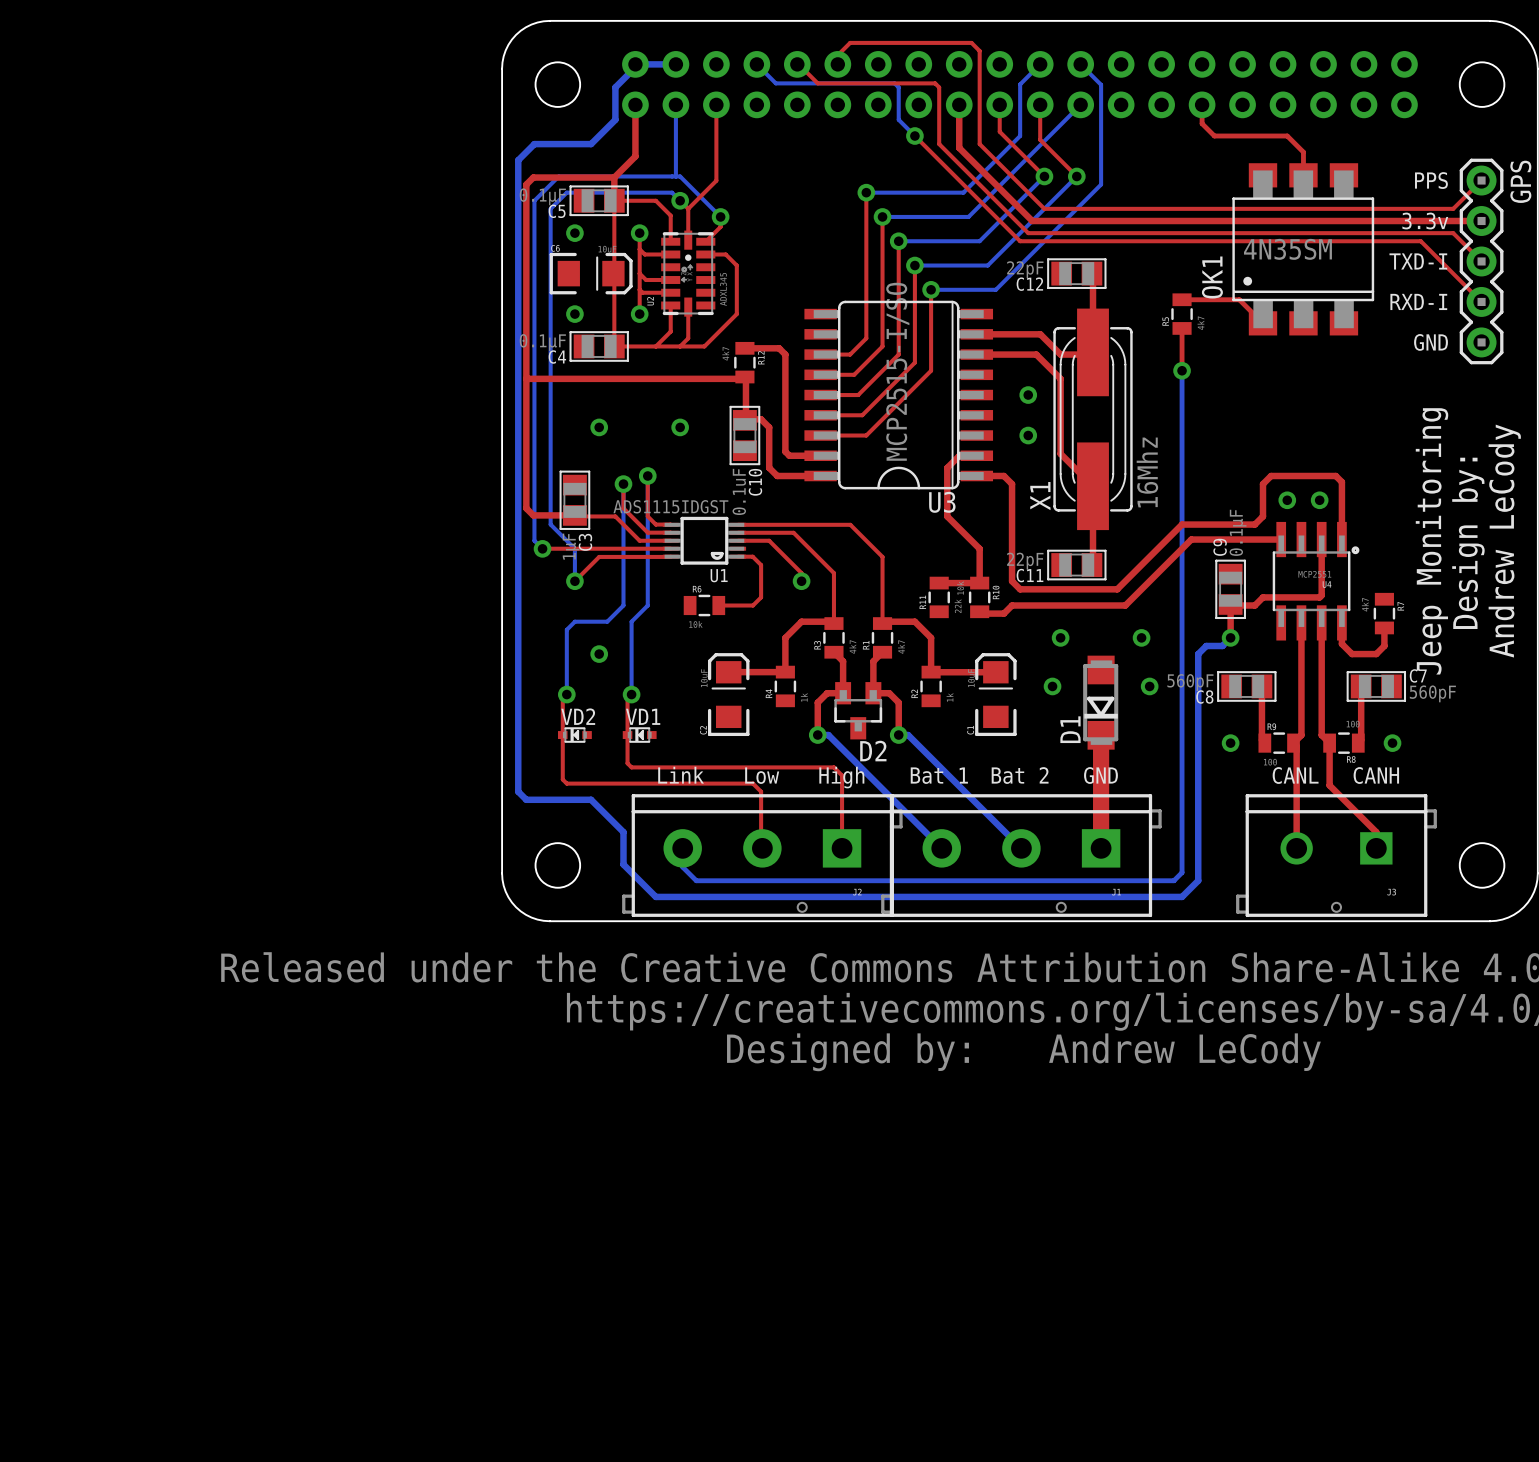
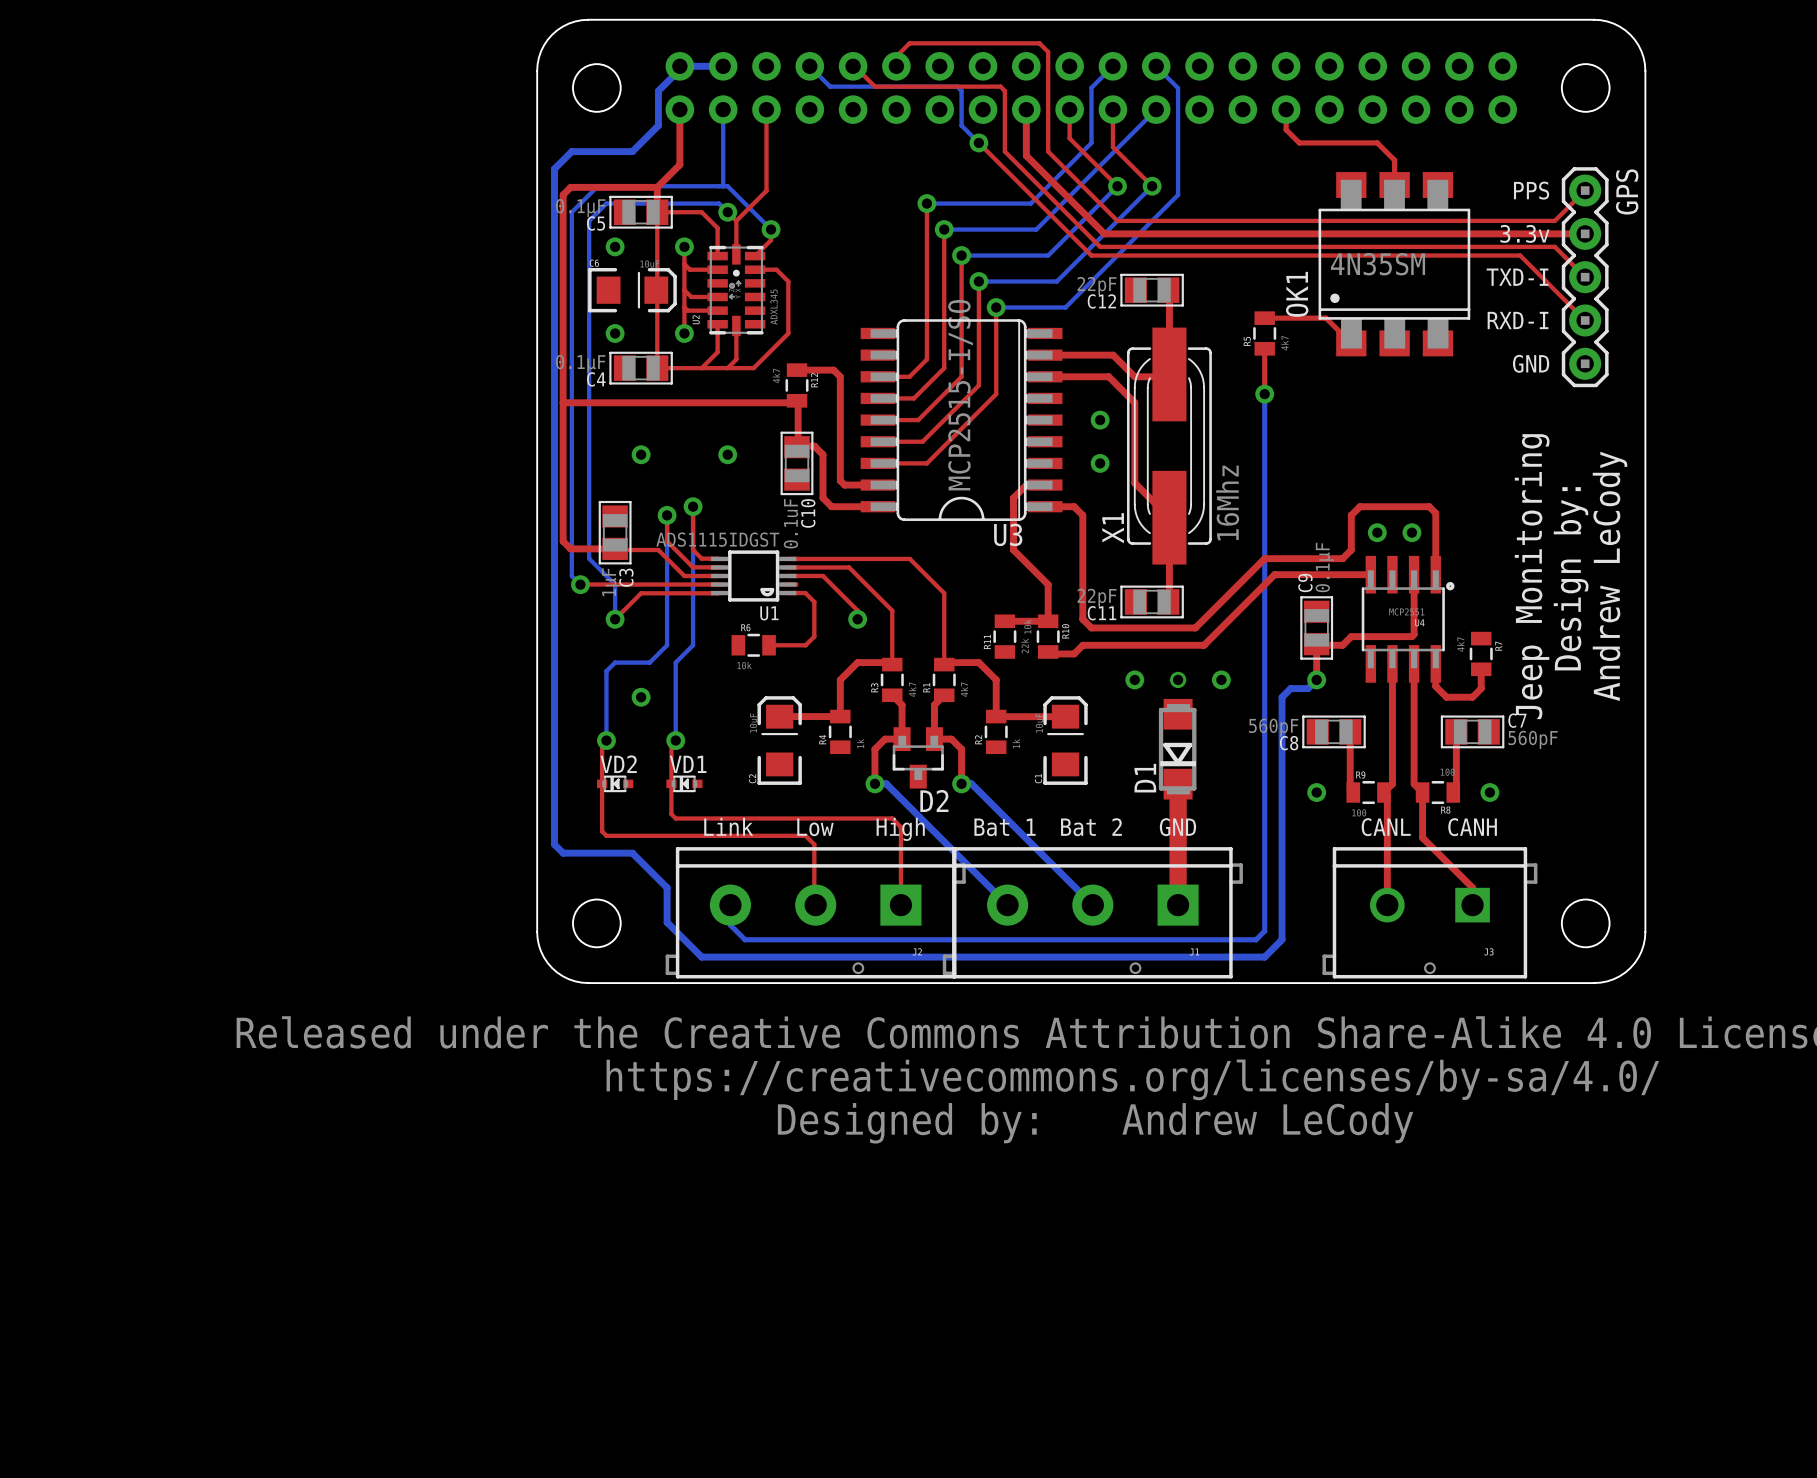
via: none -> (1178, 679)
via: (1052, 686) -> none
via: (1149, 686) -> none

